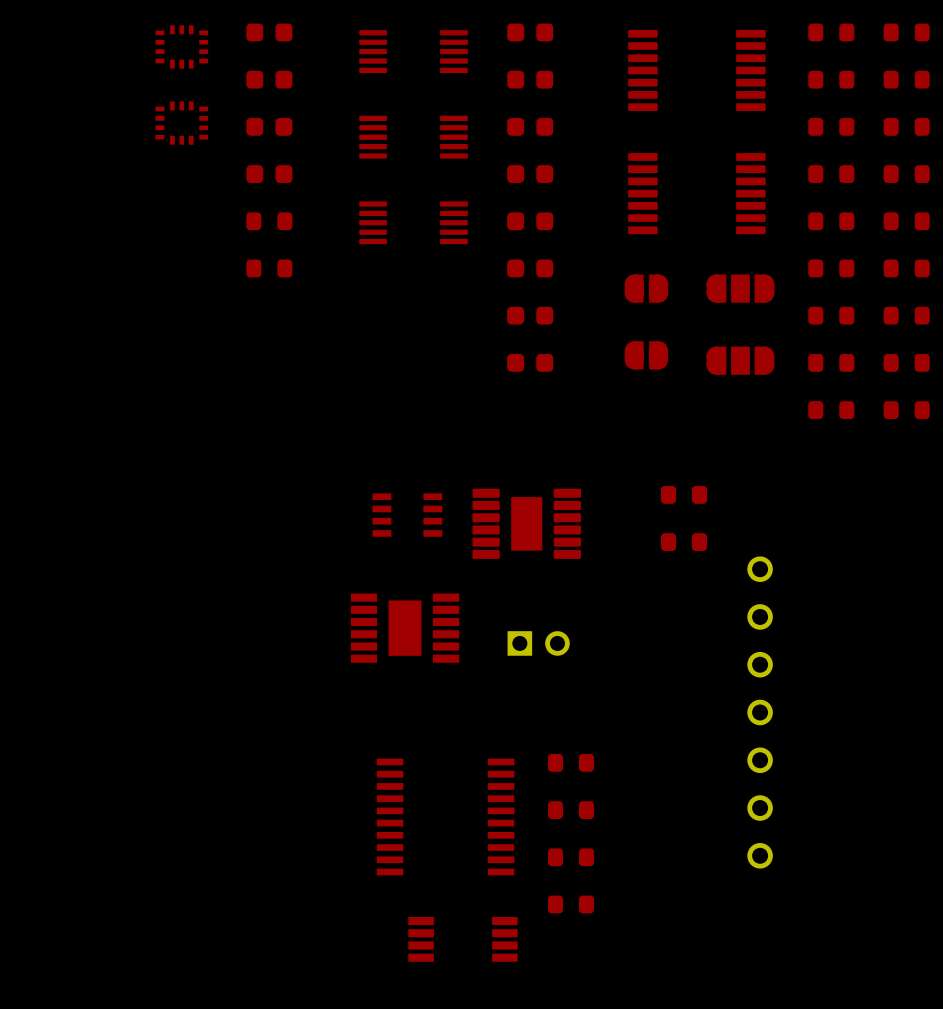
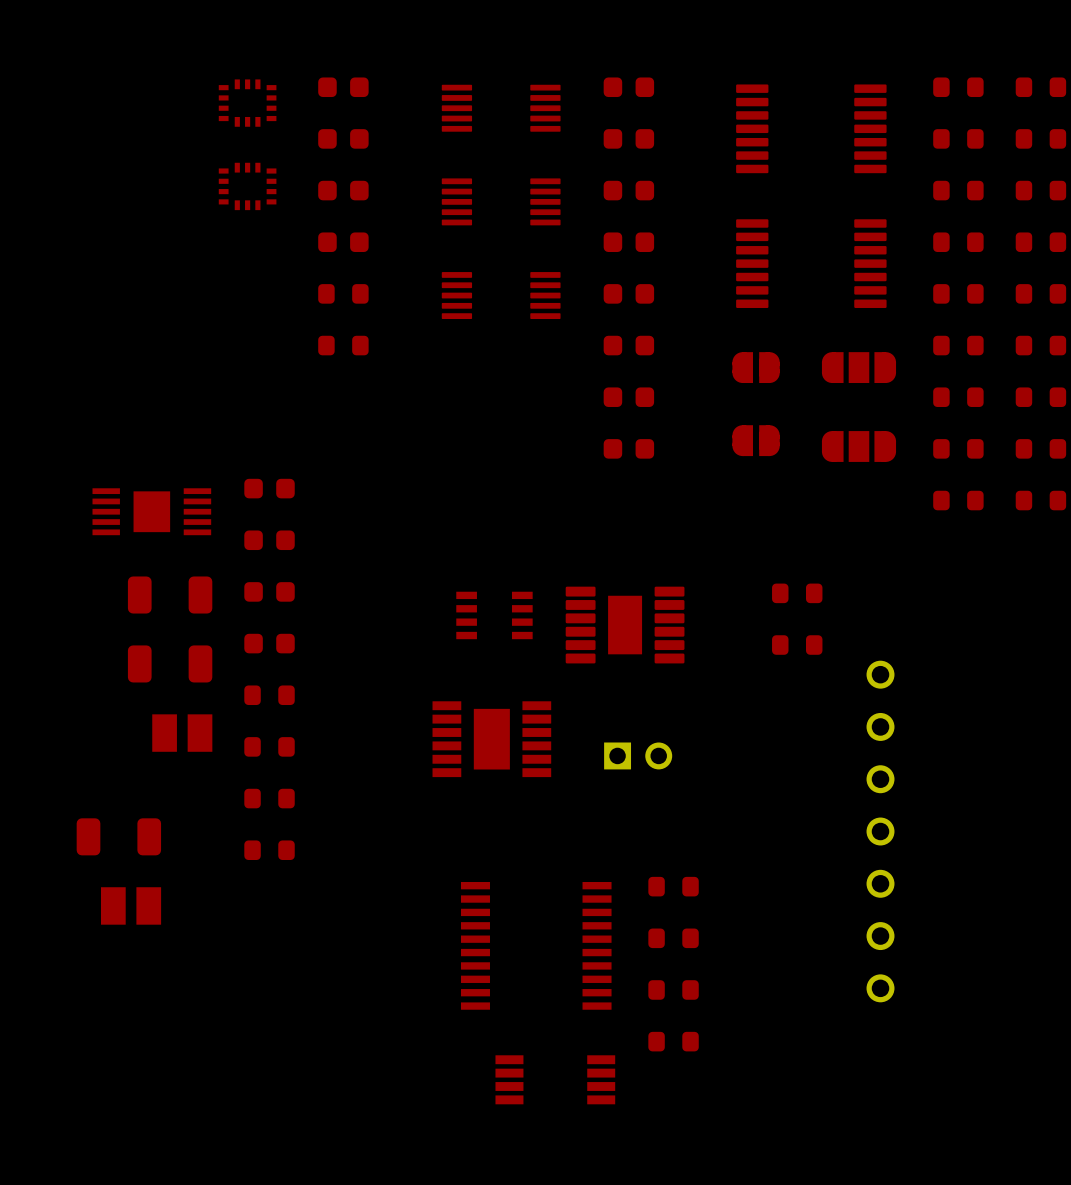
part: none -> (269, 488)
part: none -> (151, 511)
part: none -> (269, 540)
part: none -> (269, 591)
part: none -> (170, 595)
part: none -> (269, 643)
part: none -> (170, 663)
part: none -> (269, 695)
part: none -> (182, 733)
part: none -> (269, 746)
part: none -> (269, 798)
part: none -> (118, 836)
part: none -> (269, 850)
part: none -> (131, 905)

